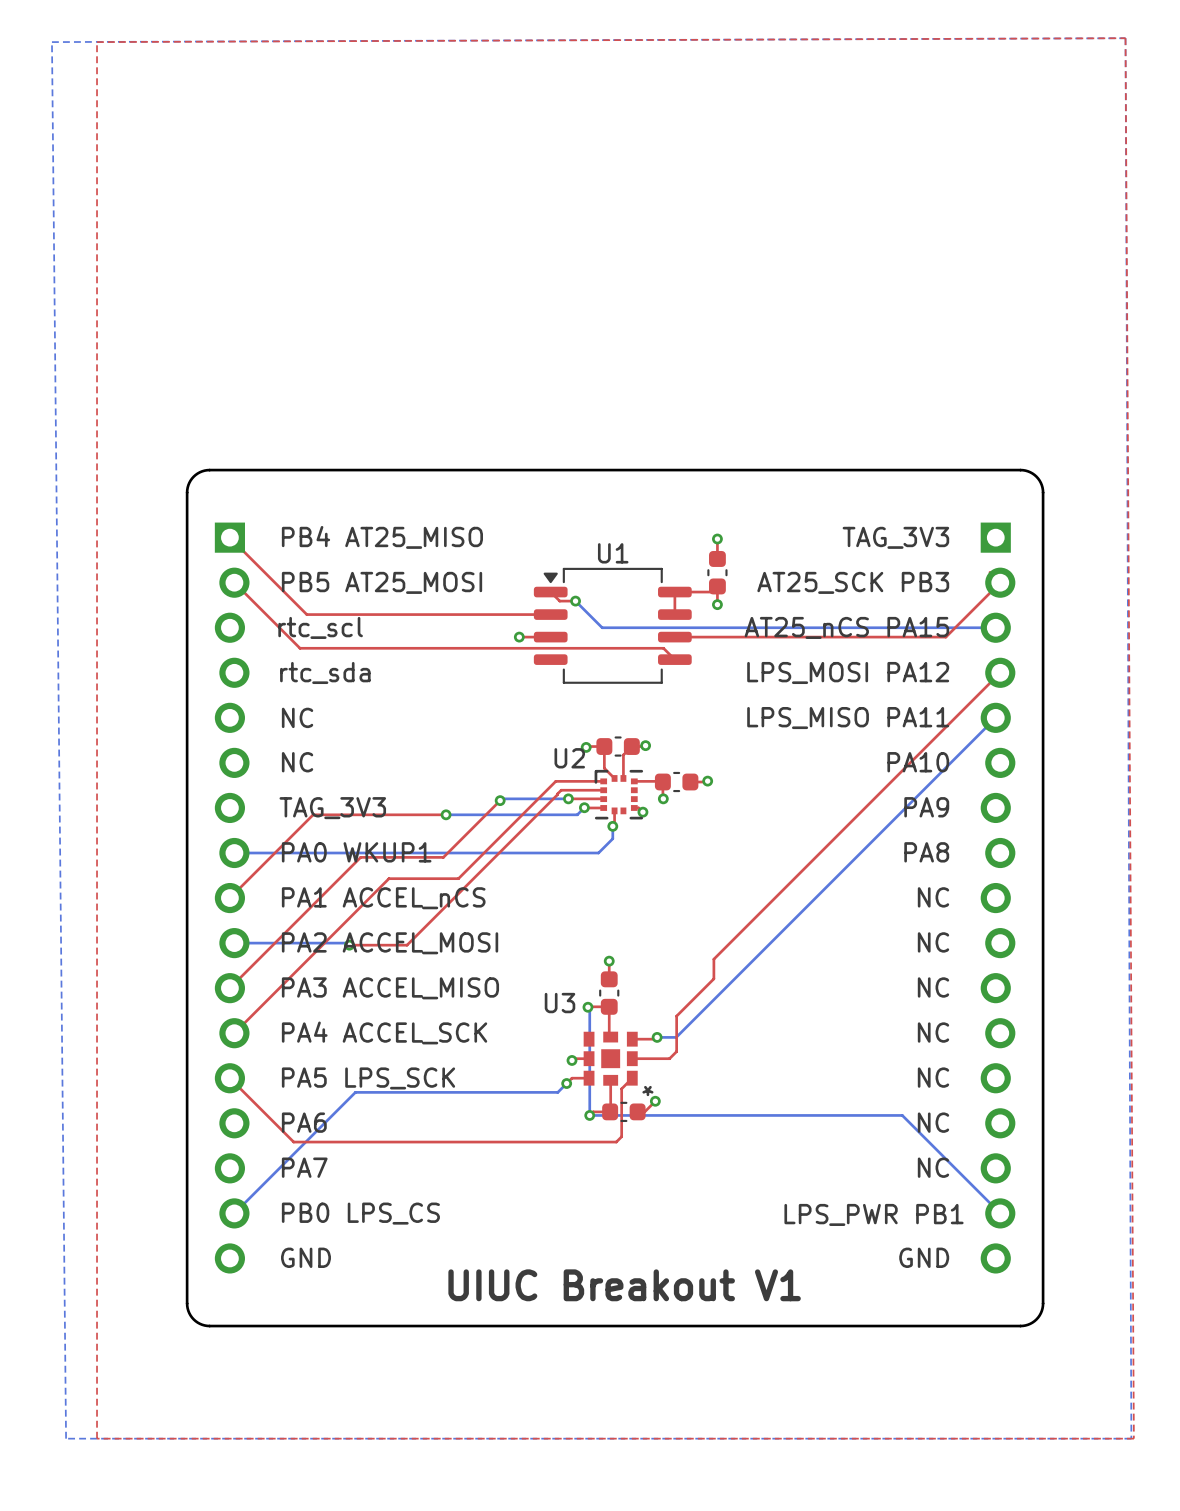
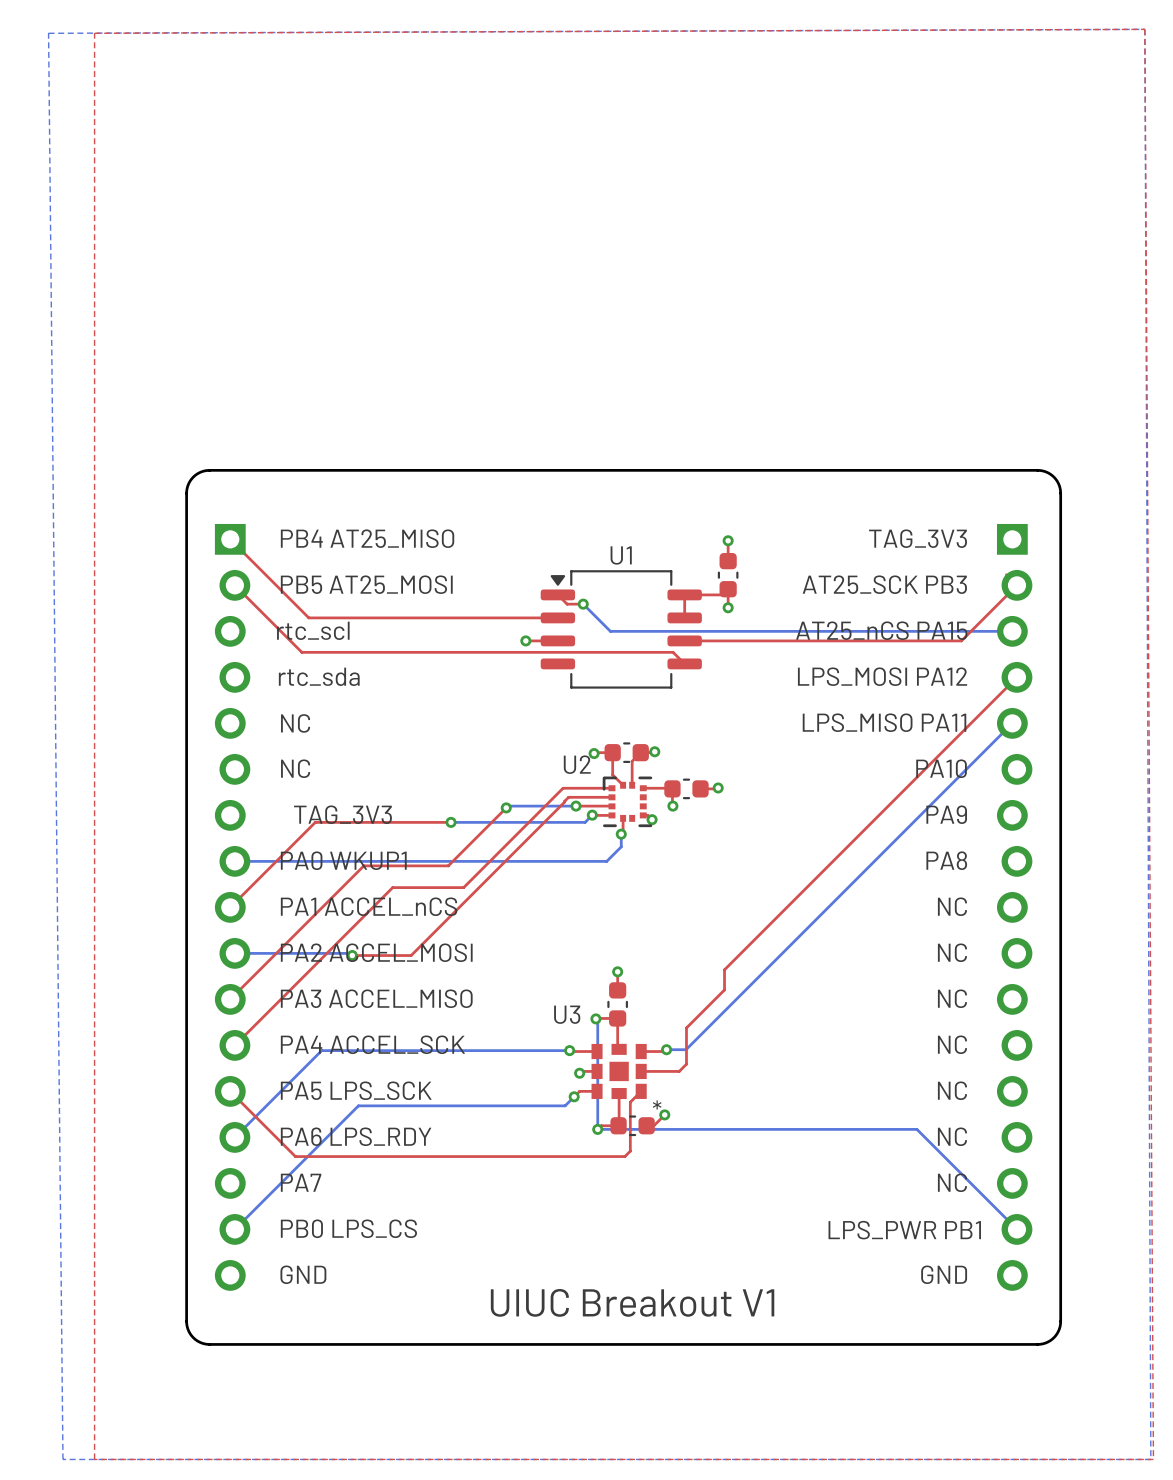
top track: none -> (569, 1050) (597, 1051)
bottom track: none -> (569, 1050) (321, 1050) (234, 1137)
via: none -> (569, 1050)
text: PA6 (304, 1122) -> PA6 LPS_RDY (356, 1136)

